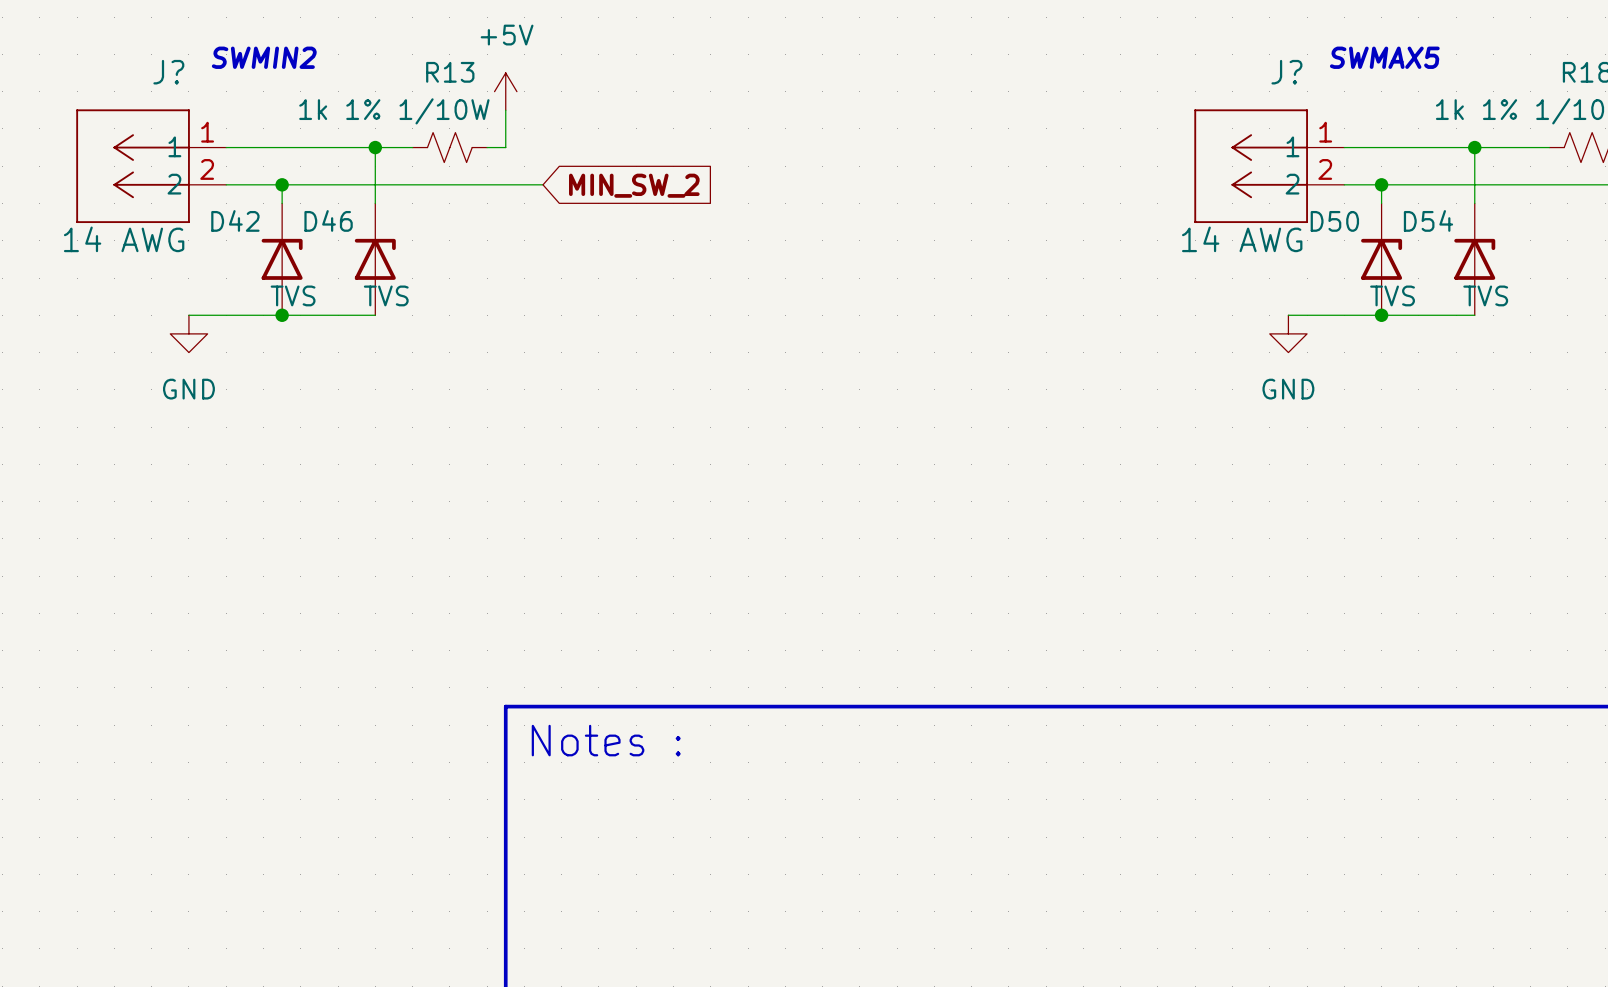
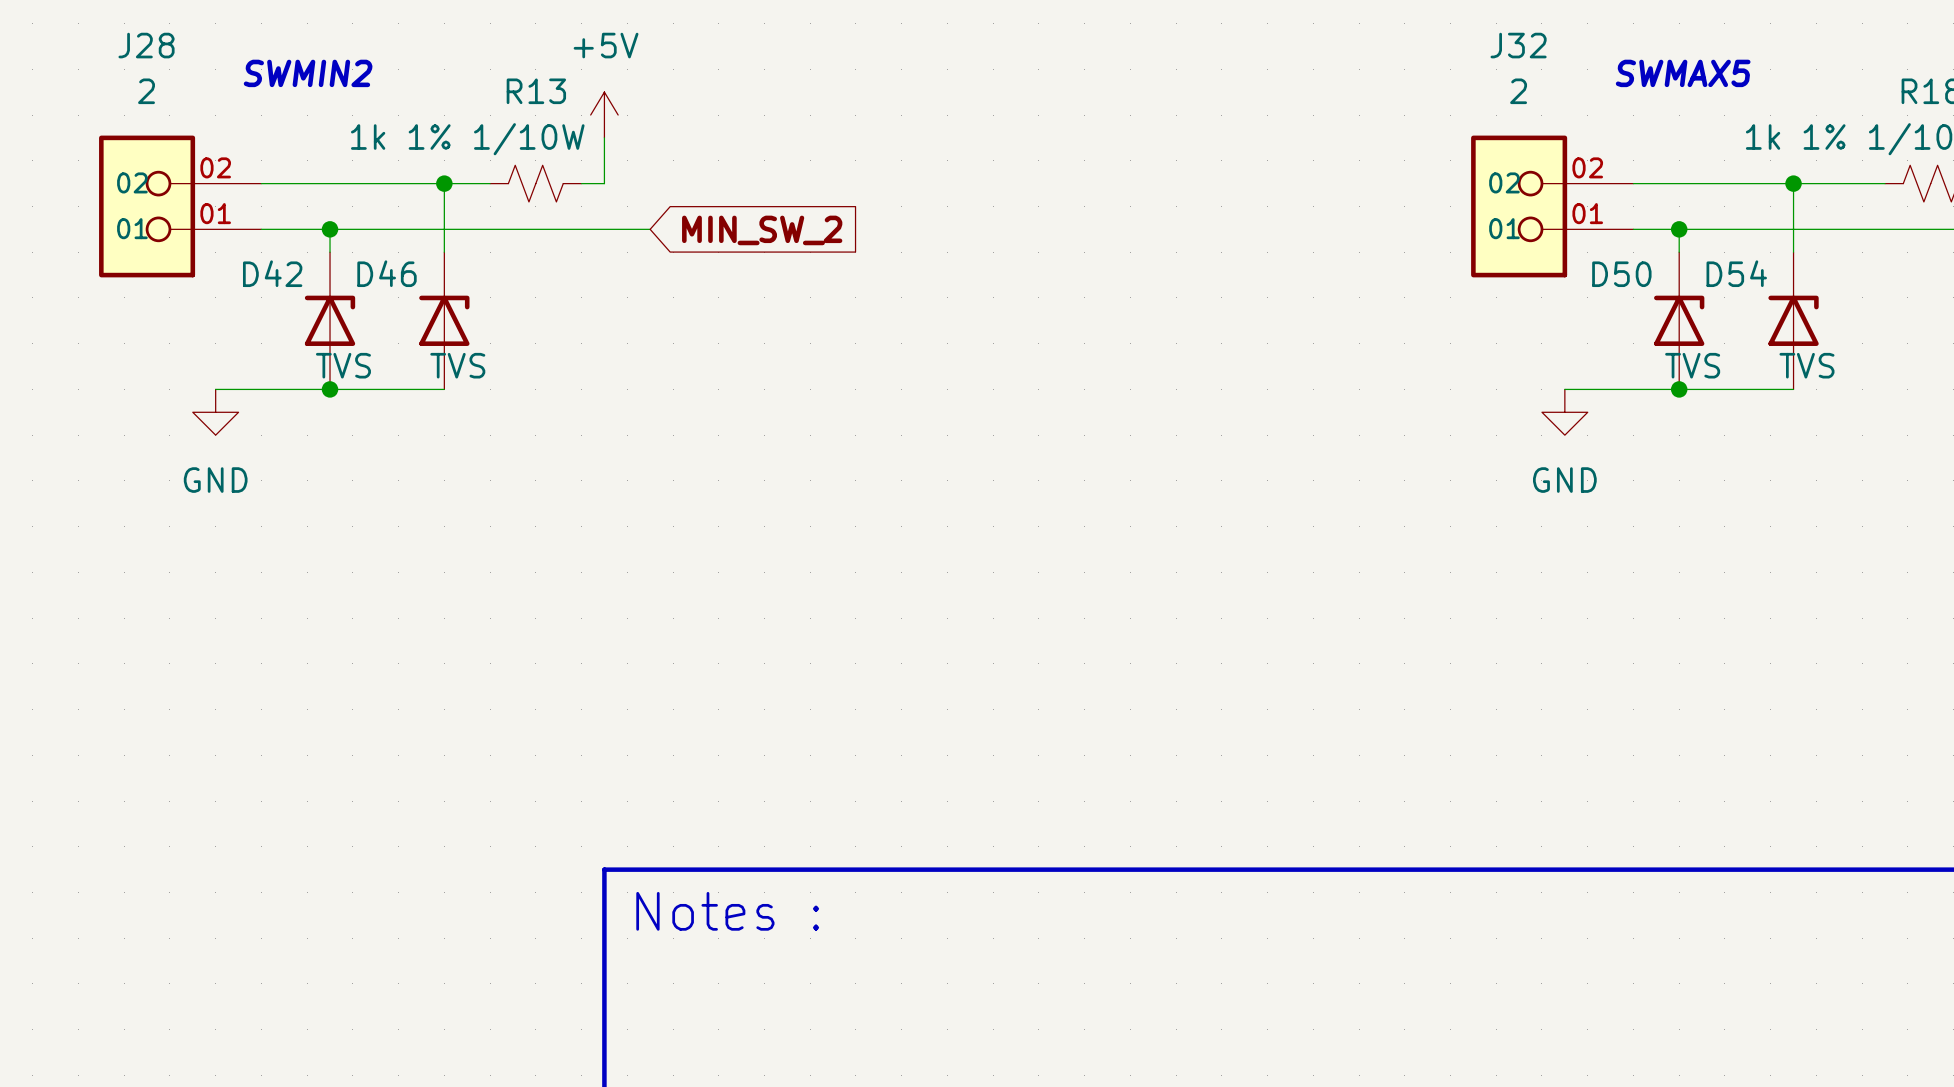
J?: 14 AWG (151, 166) -> none
J28: none -> 2 (180, 206)
J?: 14 AWG (1269, 166) -> none
J32: none -> 2 (1552, 206)

